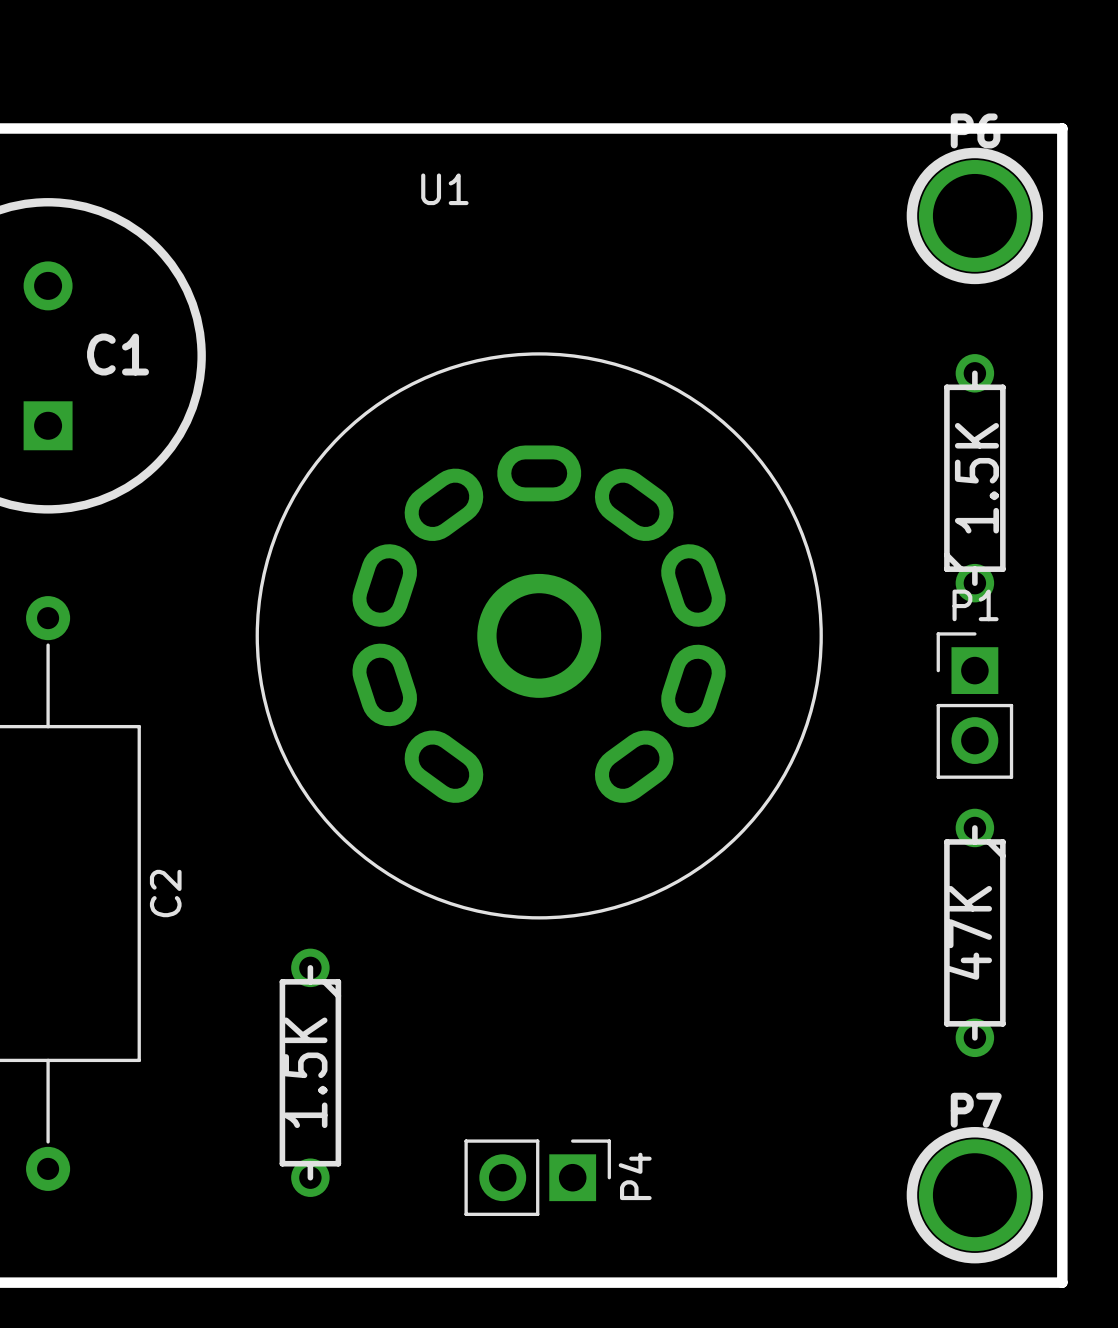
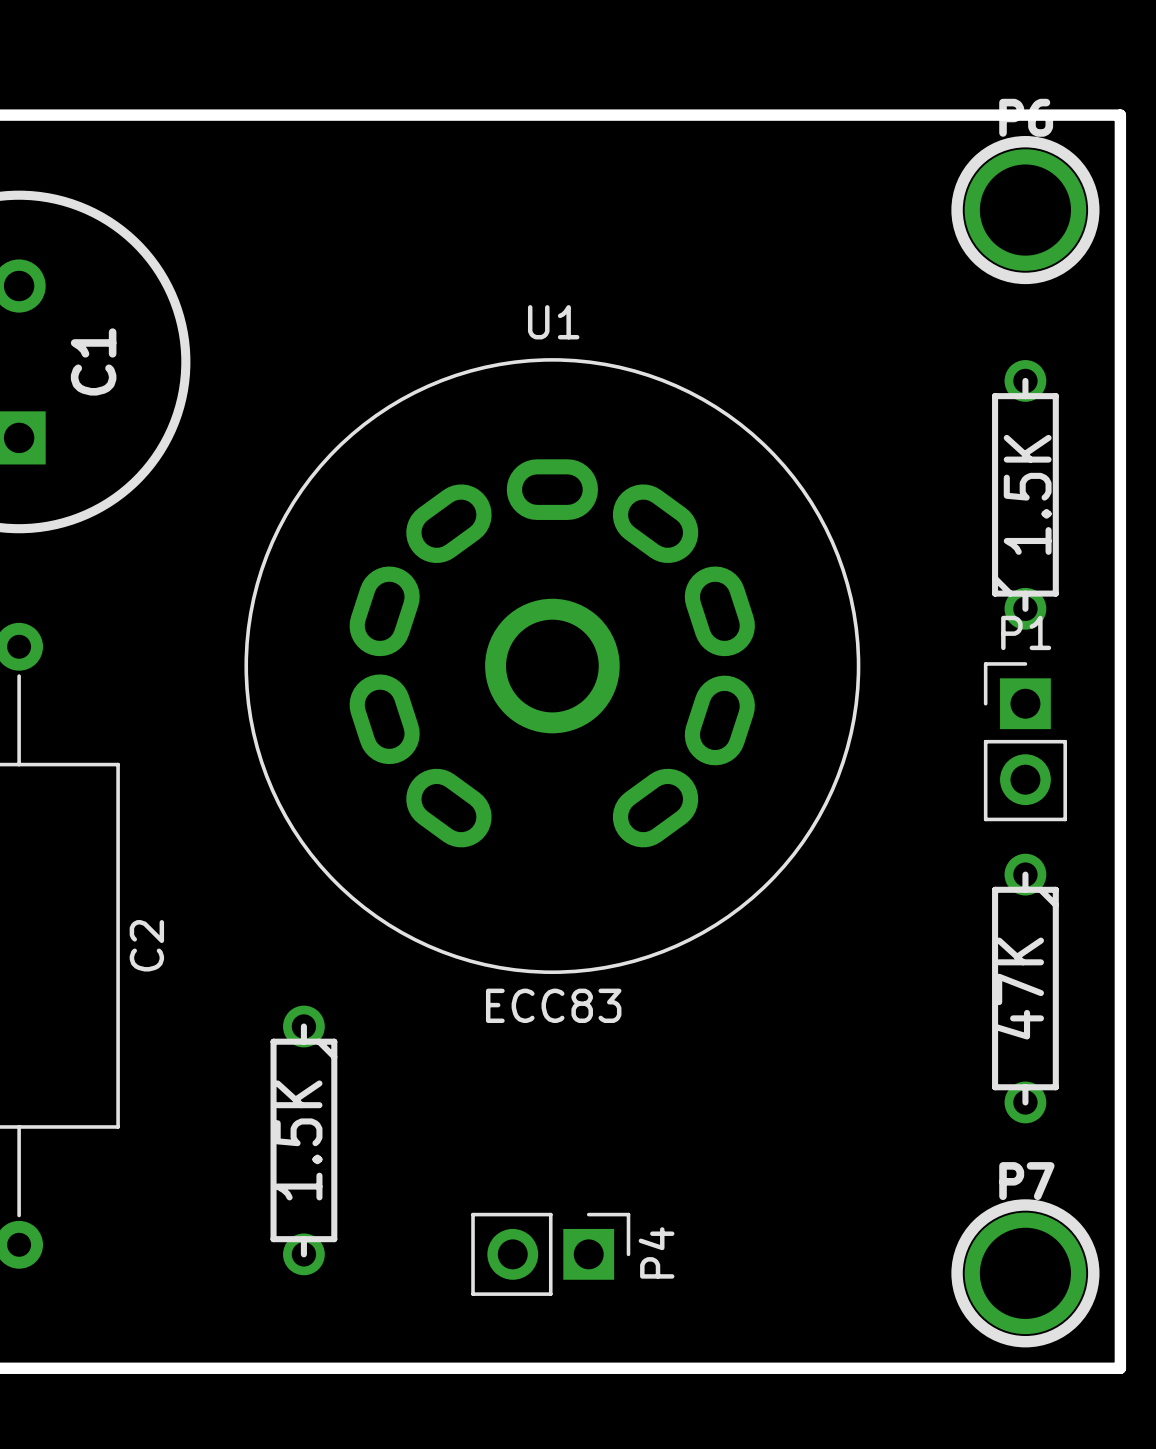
U1 name position: U1 (444, 189) -> U1 (553, 322)
C1 name rotation: 0° (118, 354) -> 90° counterclockwise (93, 361)
U1 value: none -> ECC83 (553, 1005)

